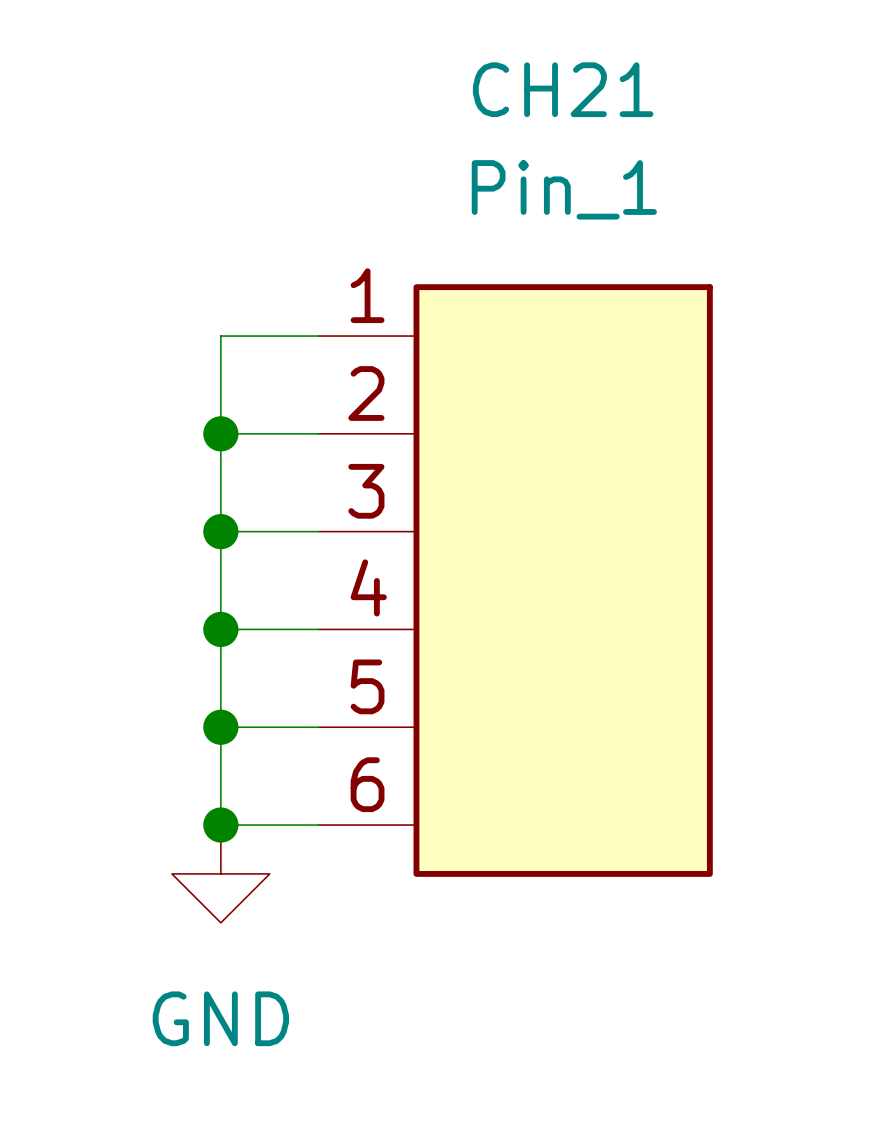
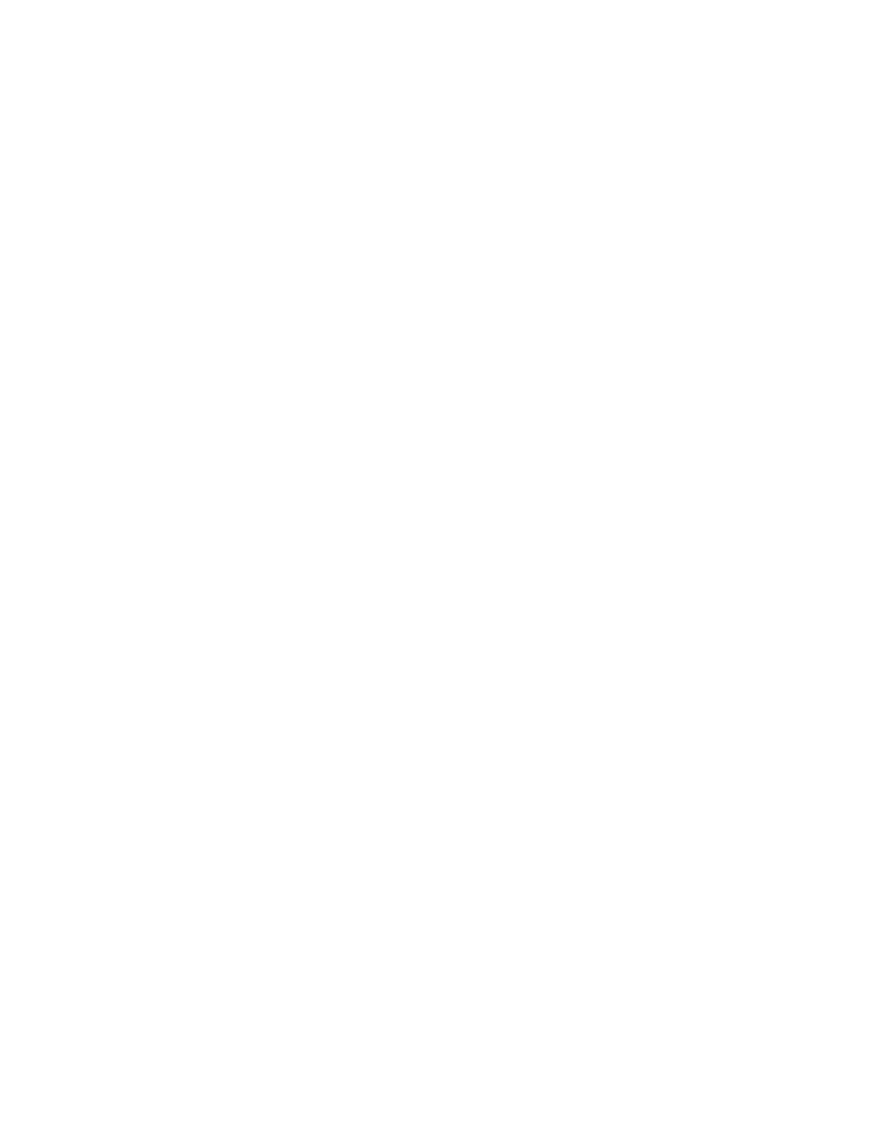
wire: (318, 336) (220, 336) (220, 825) (318, 825) -> none
wire: (220, 433) (318, 433) -> none
junction: (220, 433) -> none
wire: (220, 531) (318, 531) -> none
junction: (220, 531) -> none
CH21: Pin_1 (515, 580) -> none
wire: (220, 629) (318, 629) -> none
junction: (220, 629) -> none
wire: (220, 727) (318, 727) -> none
junction: (220, 727) -> none
junction: (220, 825) -> none
power symbol: GND (220, 873) -> none

